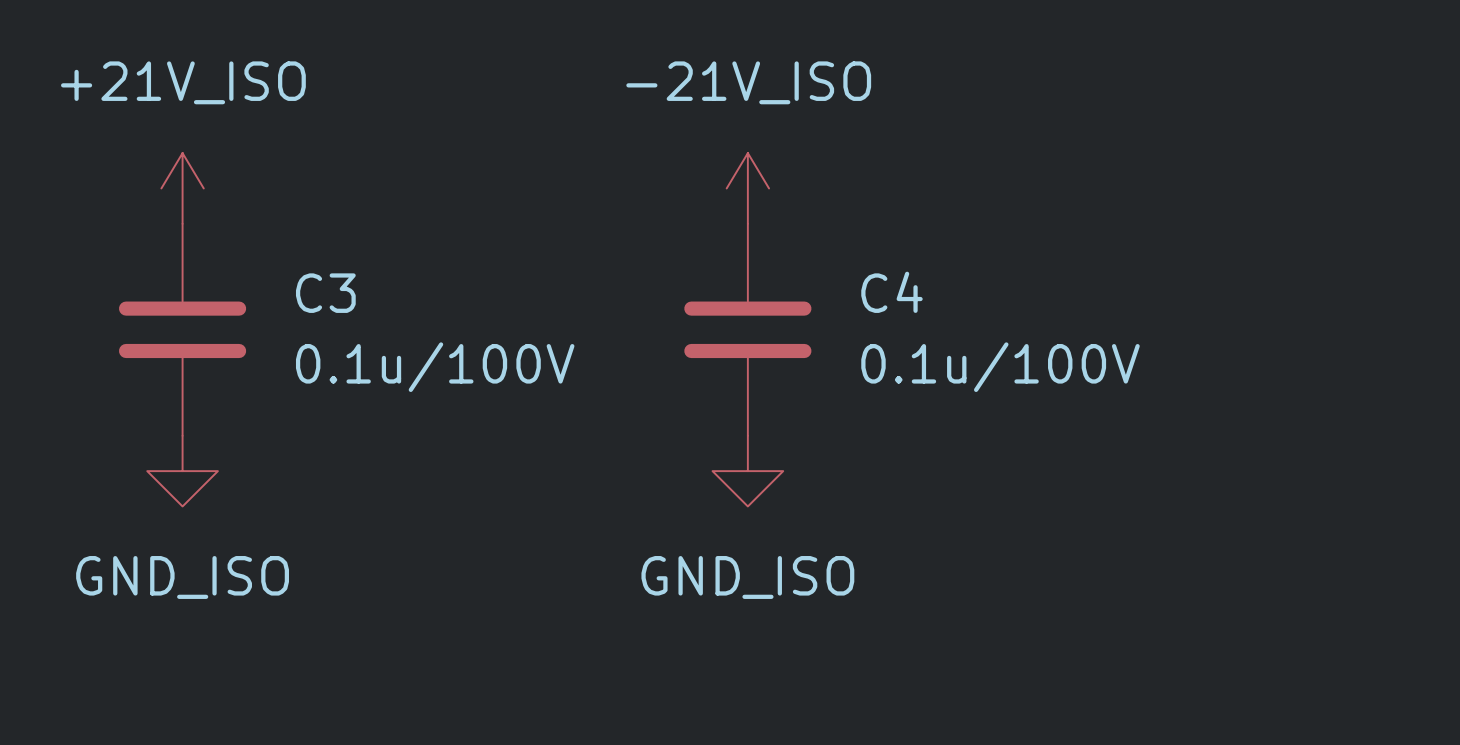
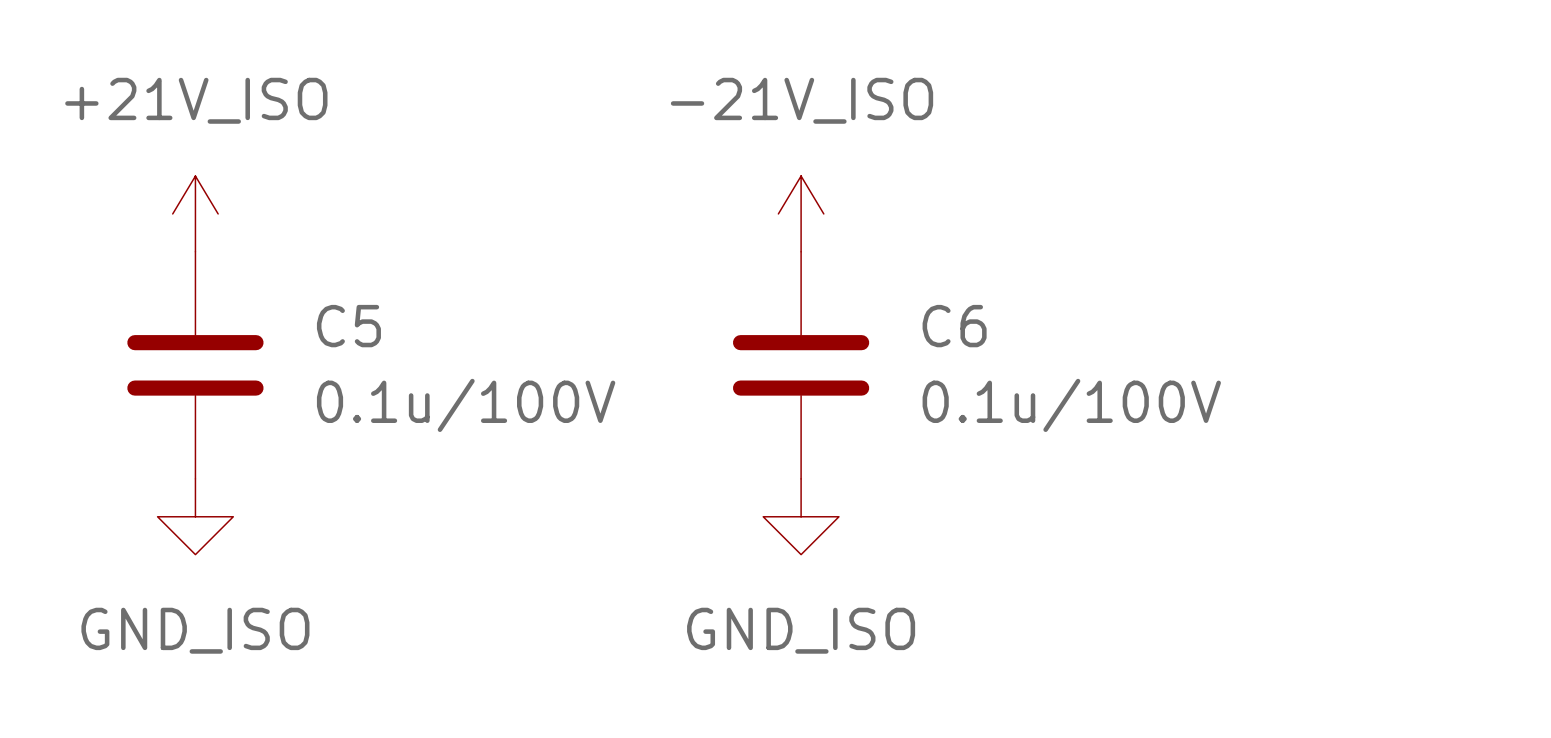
C4 name: C4 (891, 292) -> C6 (954, 326)
C3 name: C3 (325, 293) -> C5 (348, 326)

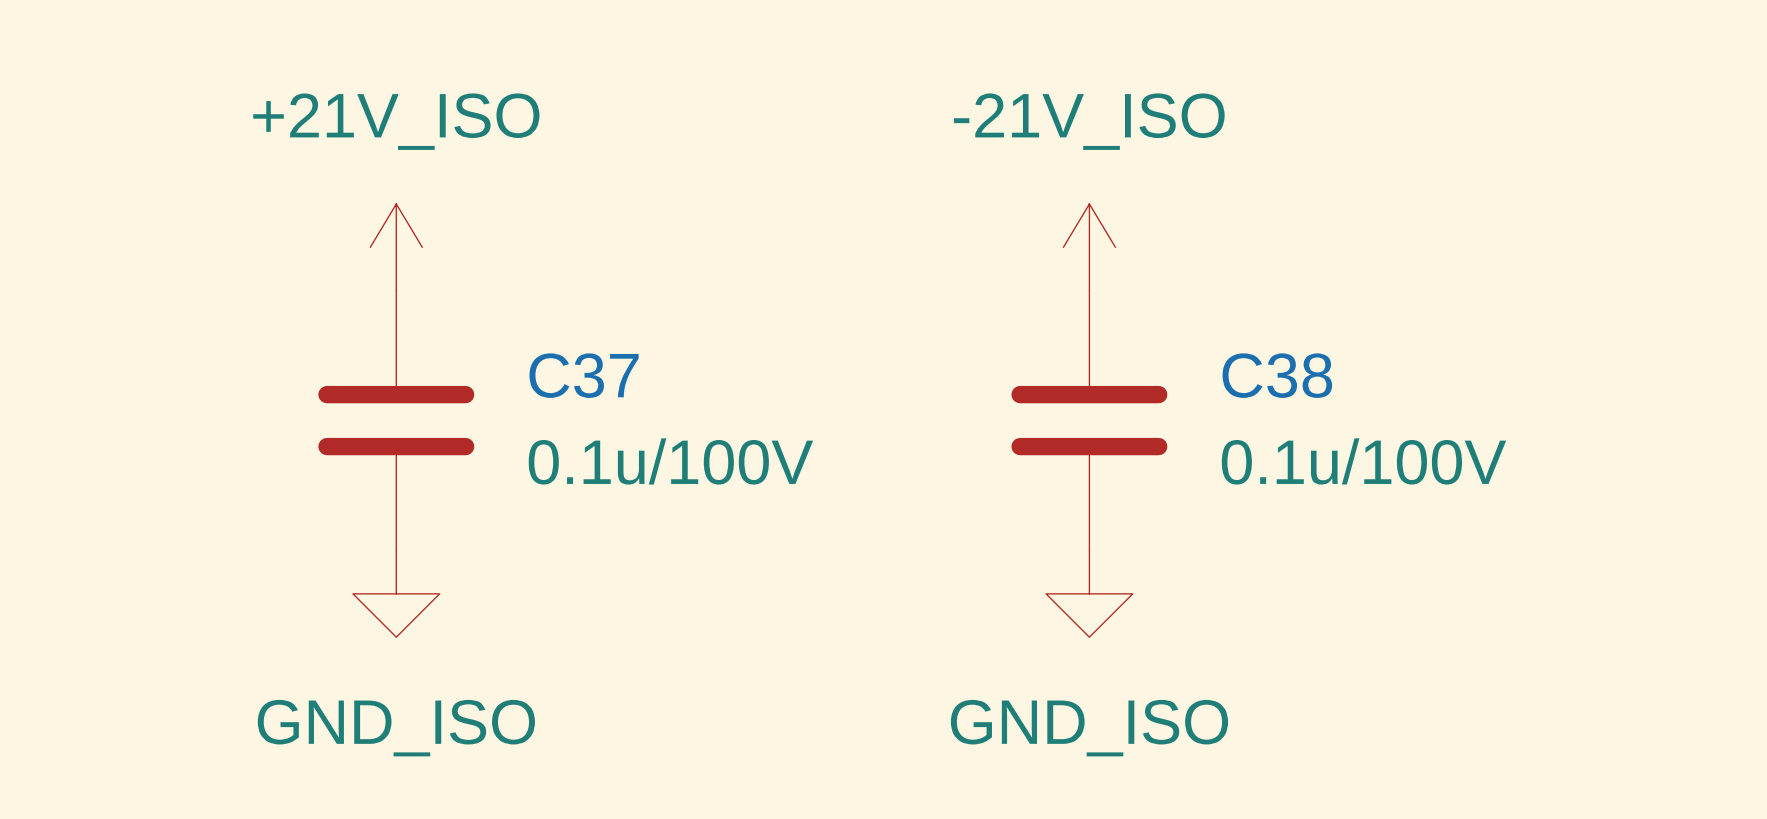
power symbol position: +21V_ISO (195, 213) -> +21V_ISO (396, 247)
power symbol position: -21V_ISO (801, 213) -> -21V_ISO (1089, 247)
C5: 0.1u/100V (195, 365) -> none
C37: none -> 0.1u/100V (396, 420)
C6: 0.1u/100V (801, 365) -> none
C38: none -> 0.1u/100V (1089, 420)
power symbol position: GND_ISO (195, 516) -> GND_ISO (396, 593)
power symbol position: GND_ISO (801, 516) -> GND_ISO (1089, 593)

